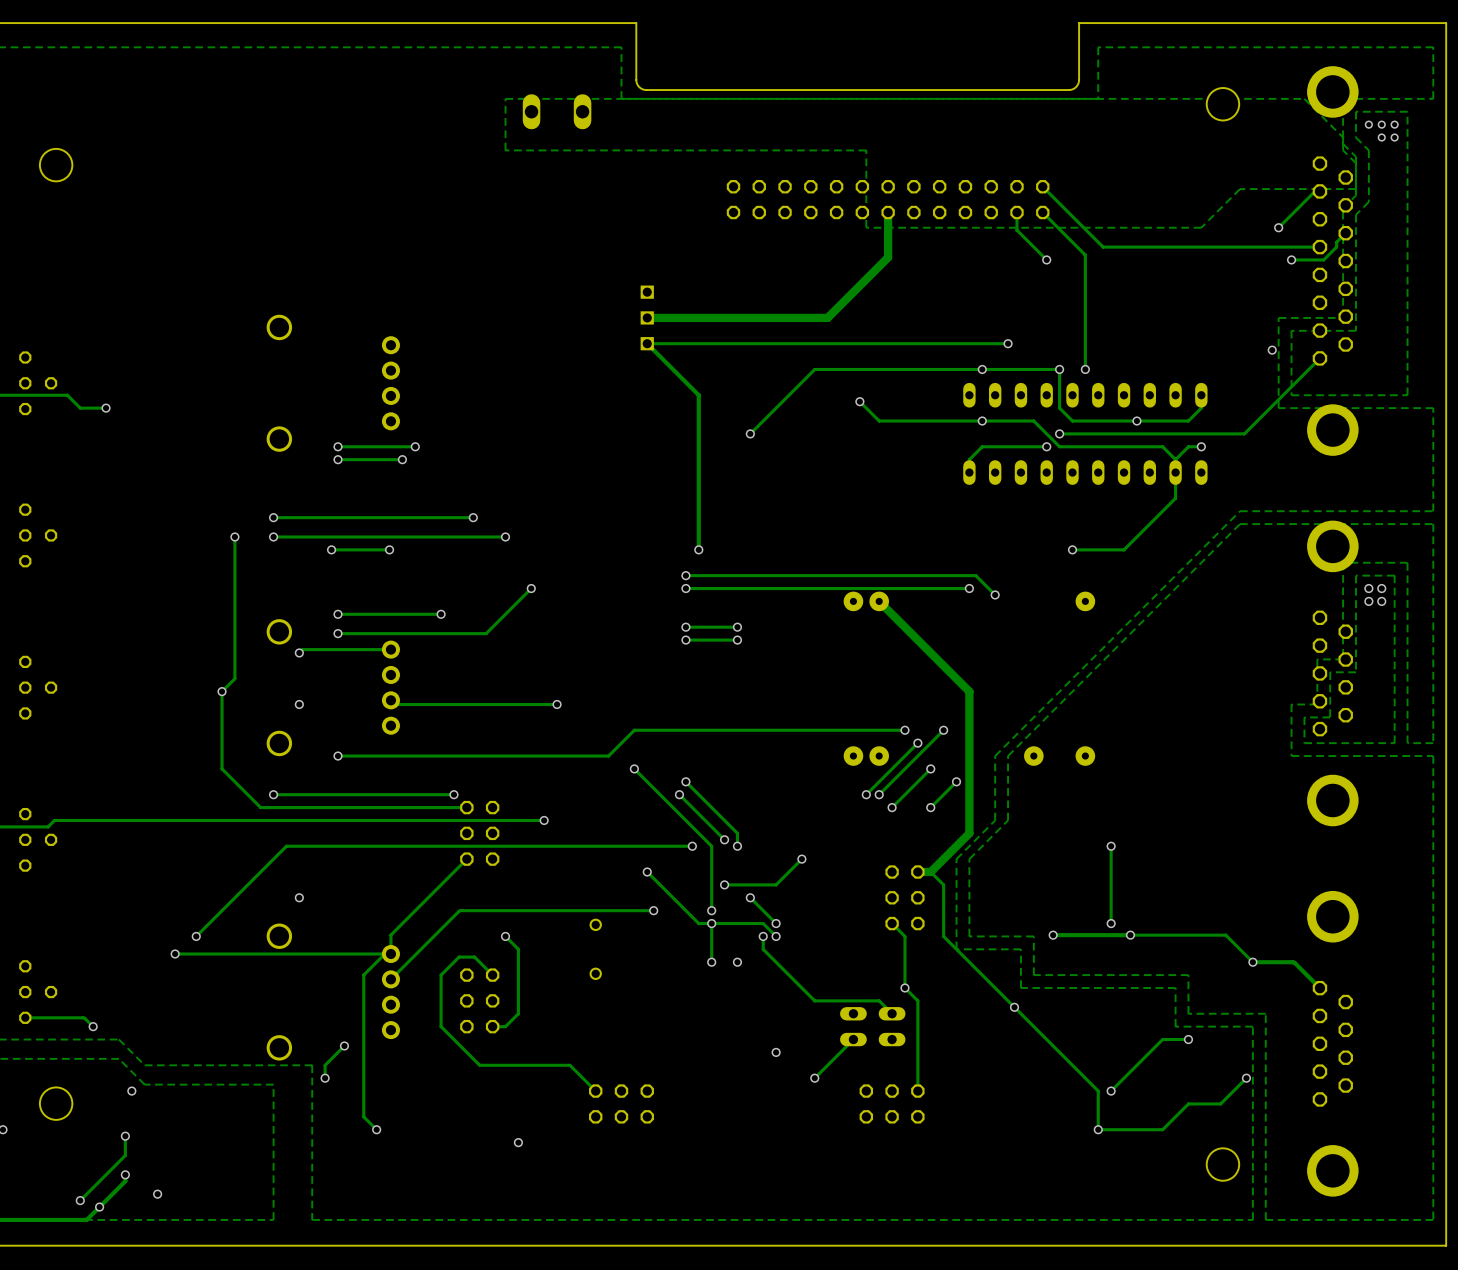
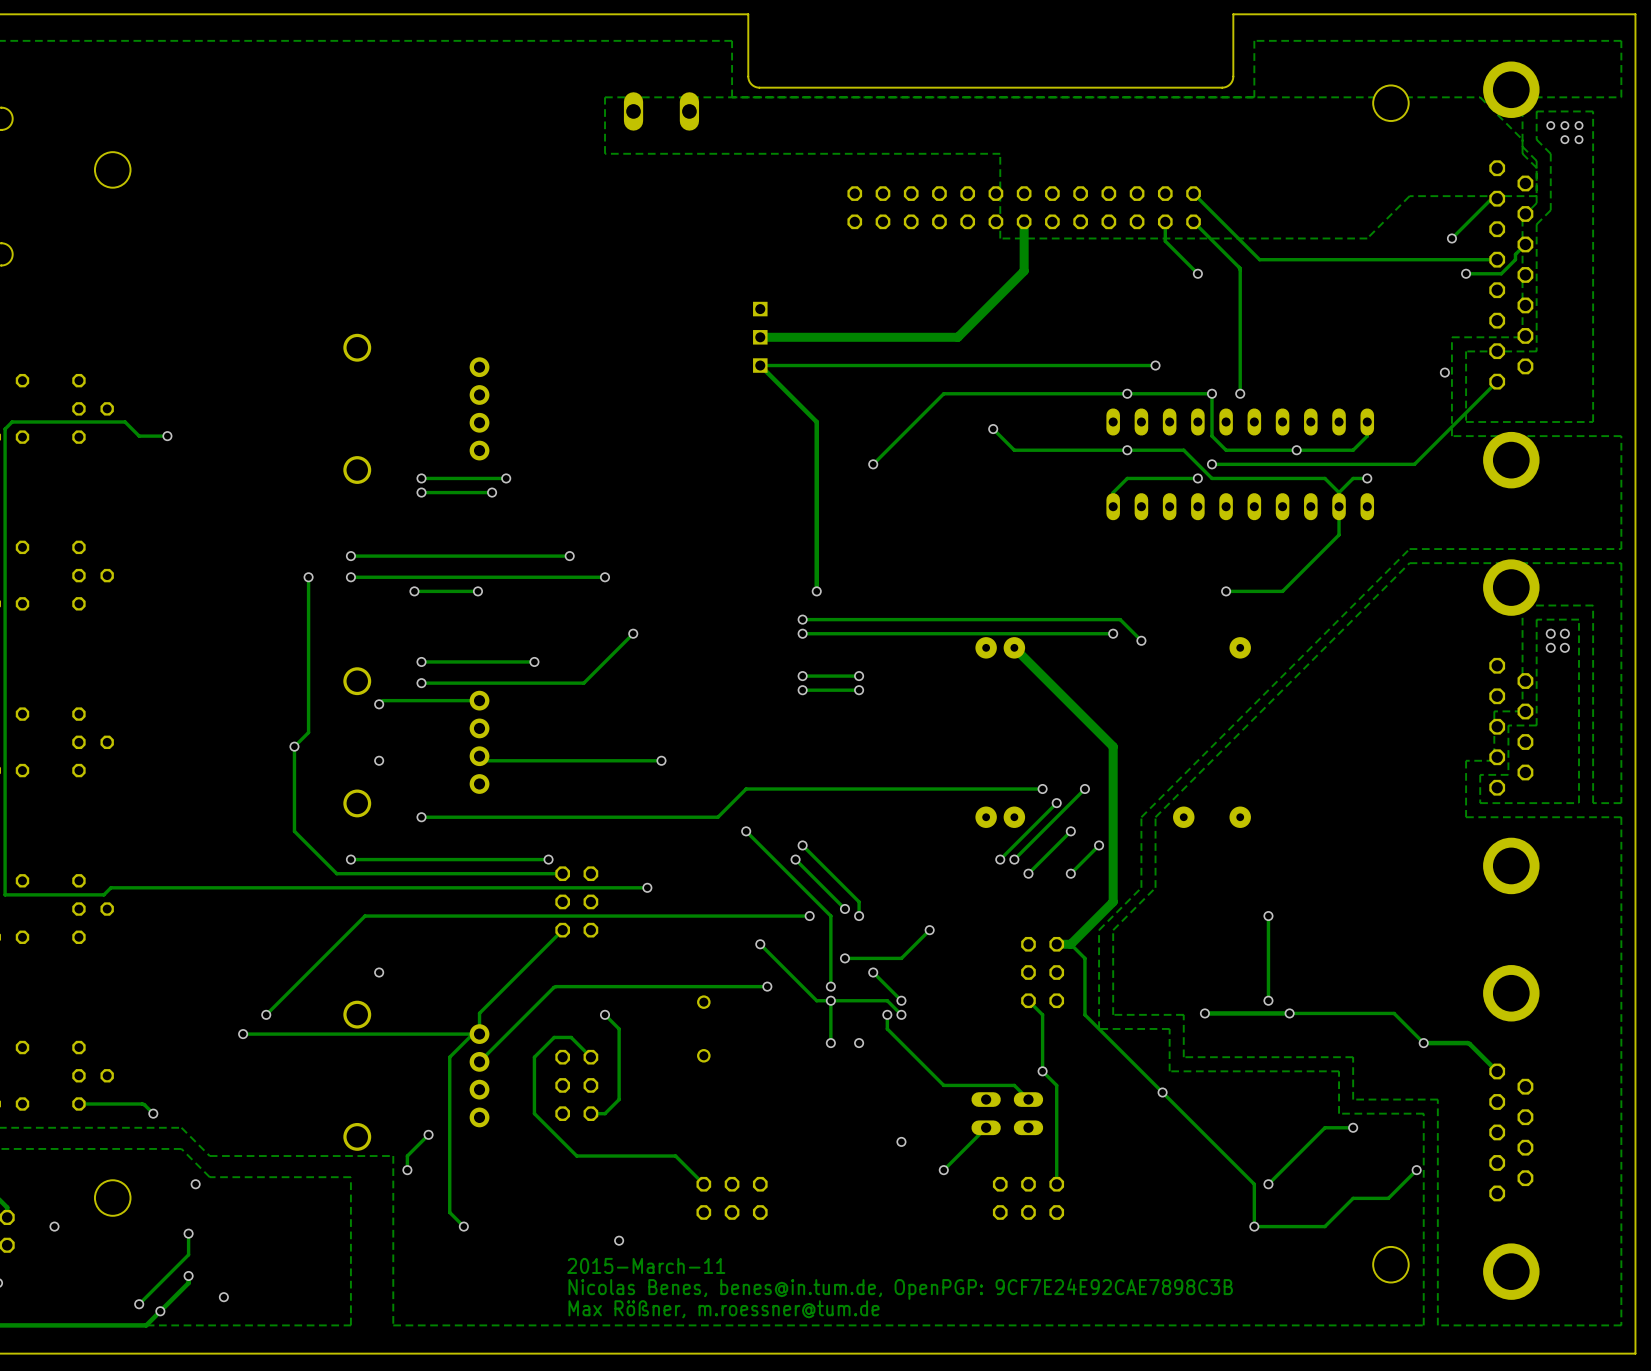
text: none -> 2015-March-11 (646, 1265)
text: none -> Nicolas Benes, benes@in.tum.de, OpenPGP: 9CF7E24E92CAE7898C3B (900, 1289)
text: none -> Max Rößner, m.roessner@tum.de (724, 1309)

